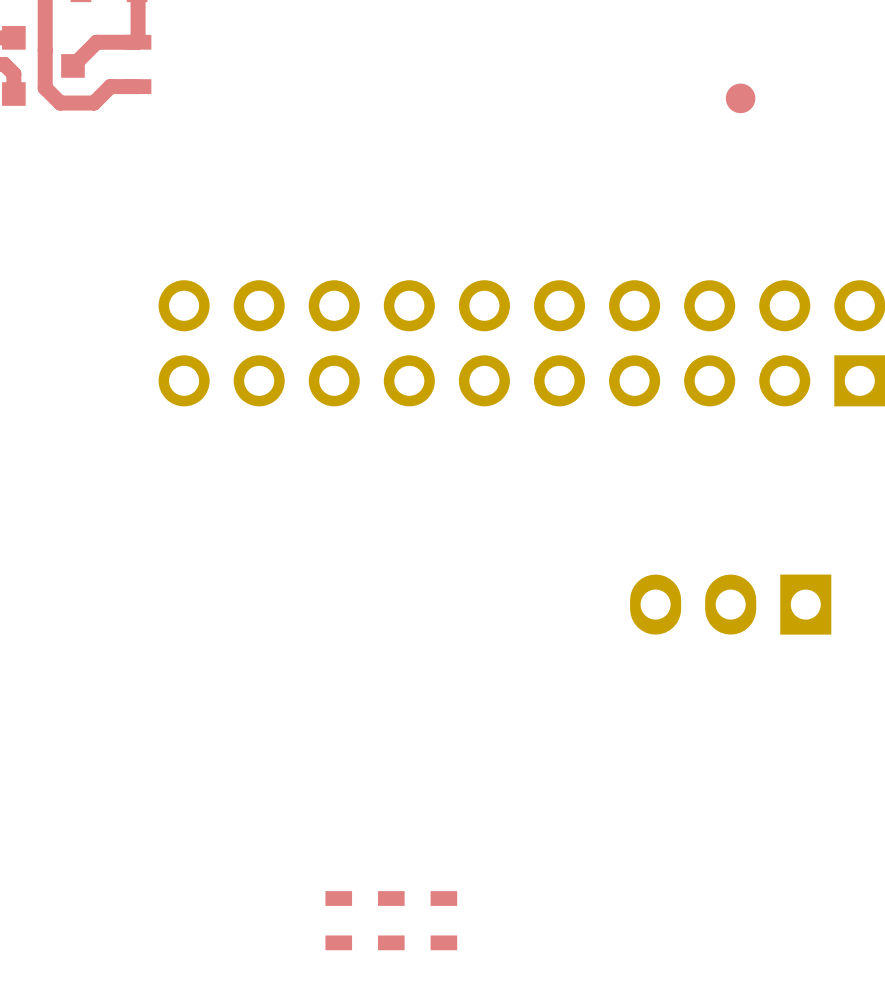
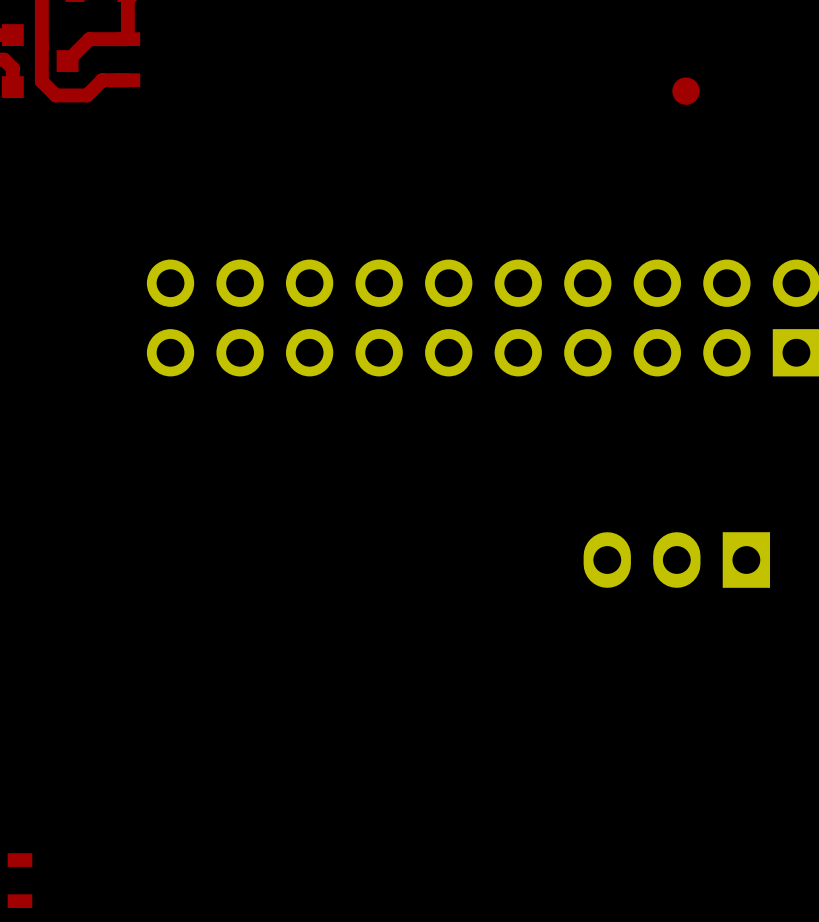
part: (338, 920) -> none
part: (391, 920) -> none
part: (443, 920) -> none
part: none -> (19, 880)

